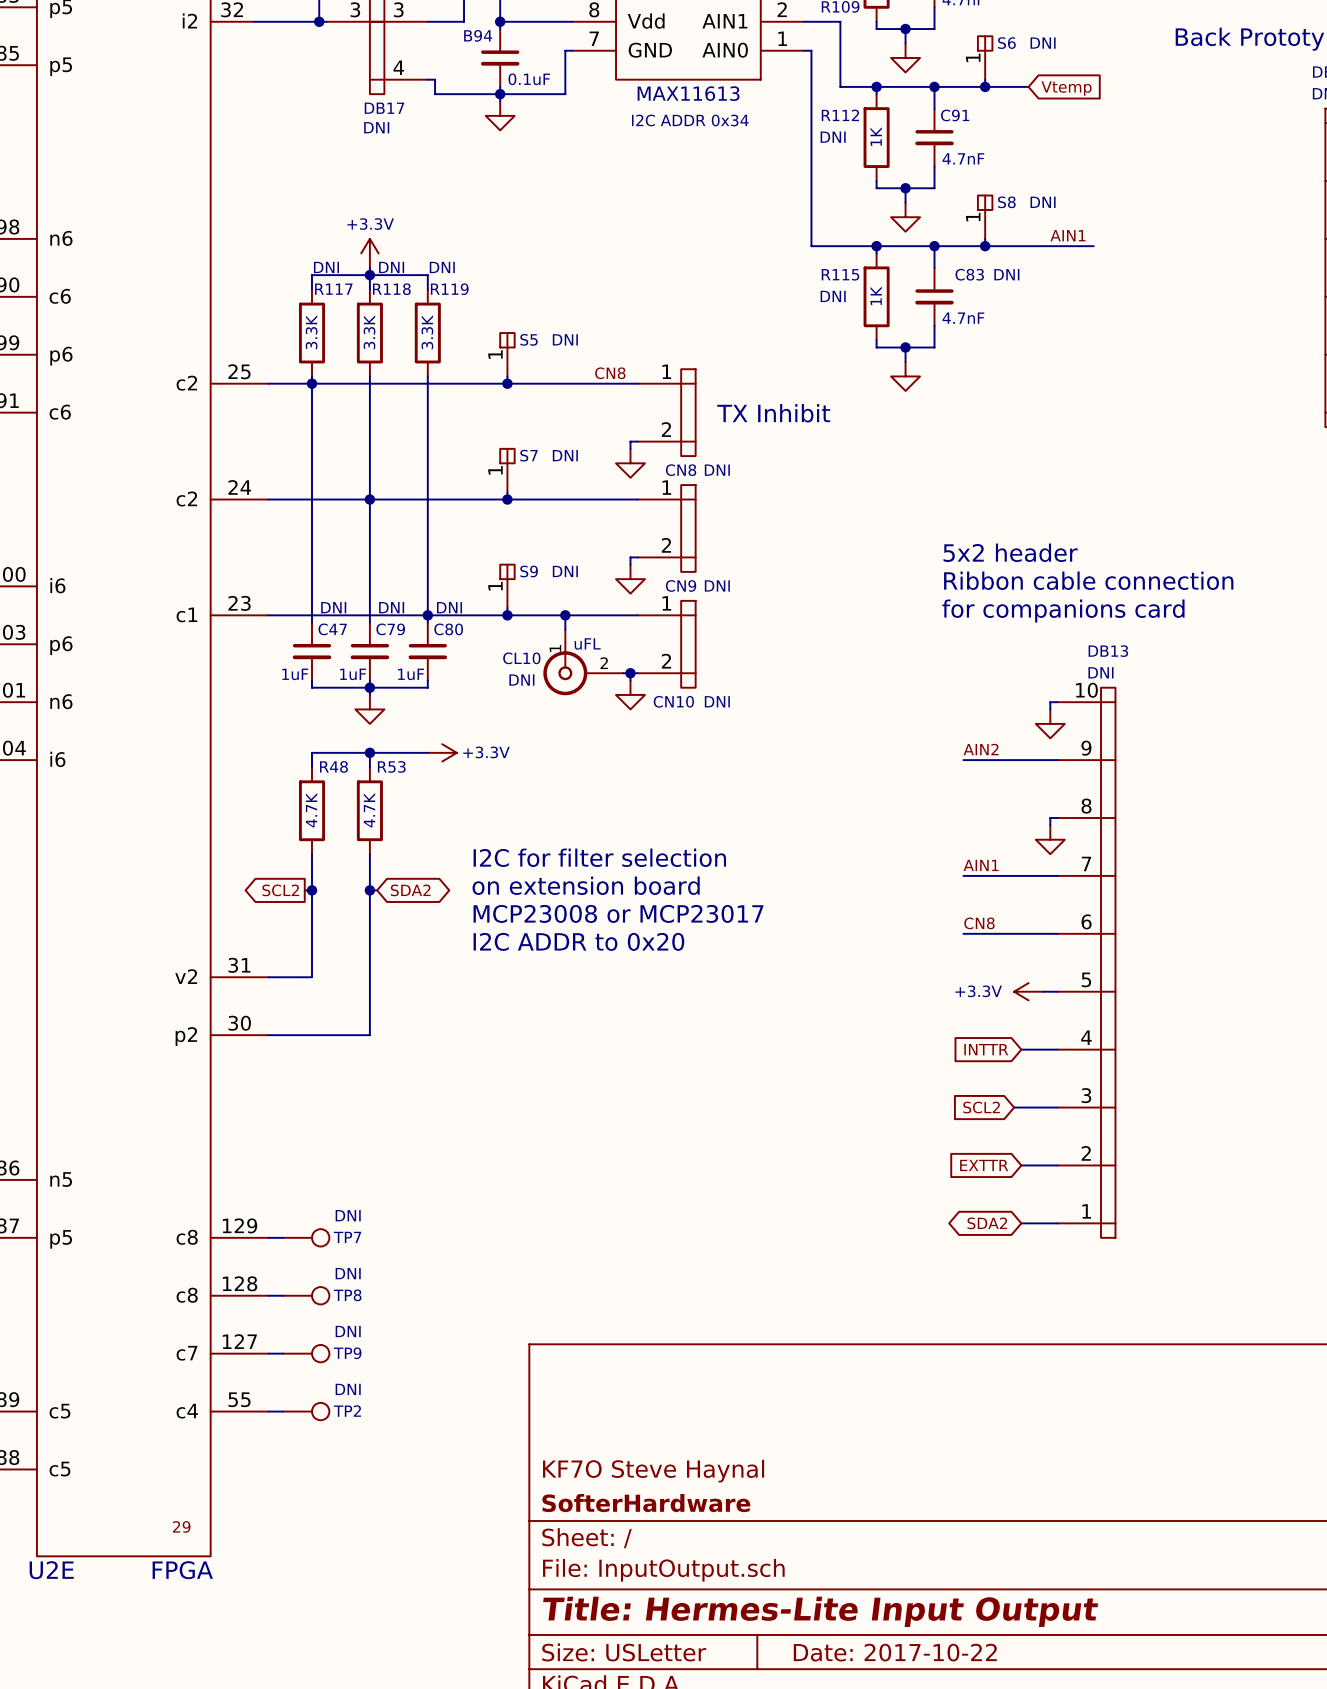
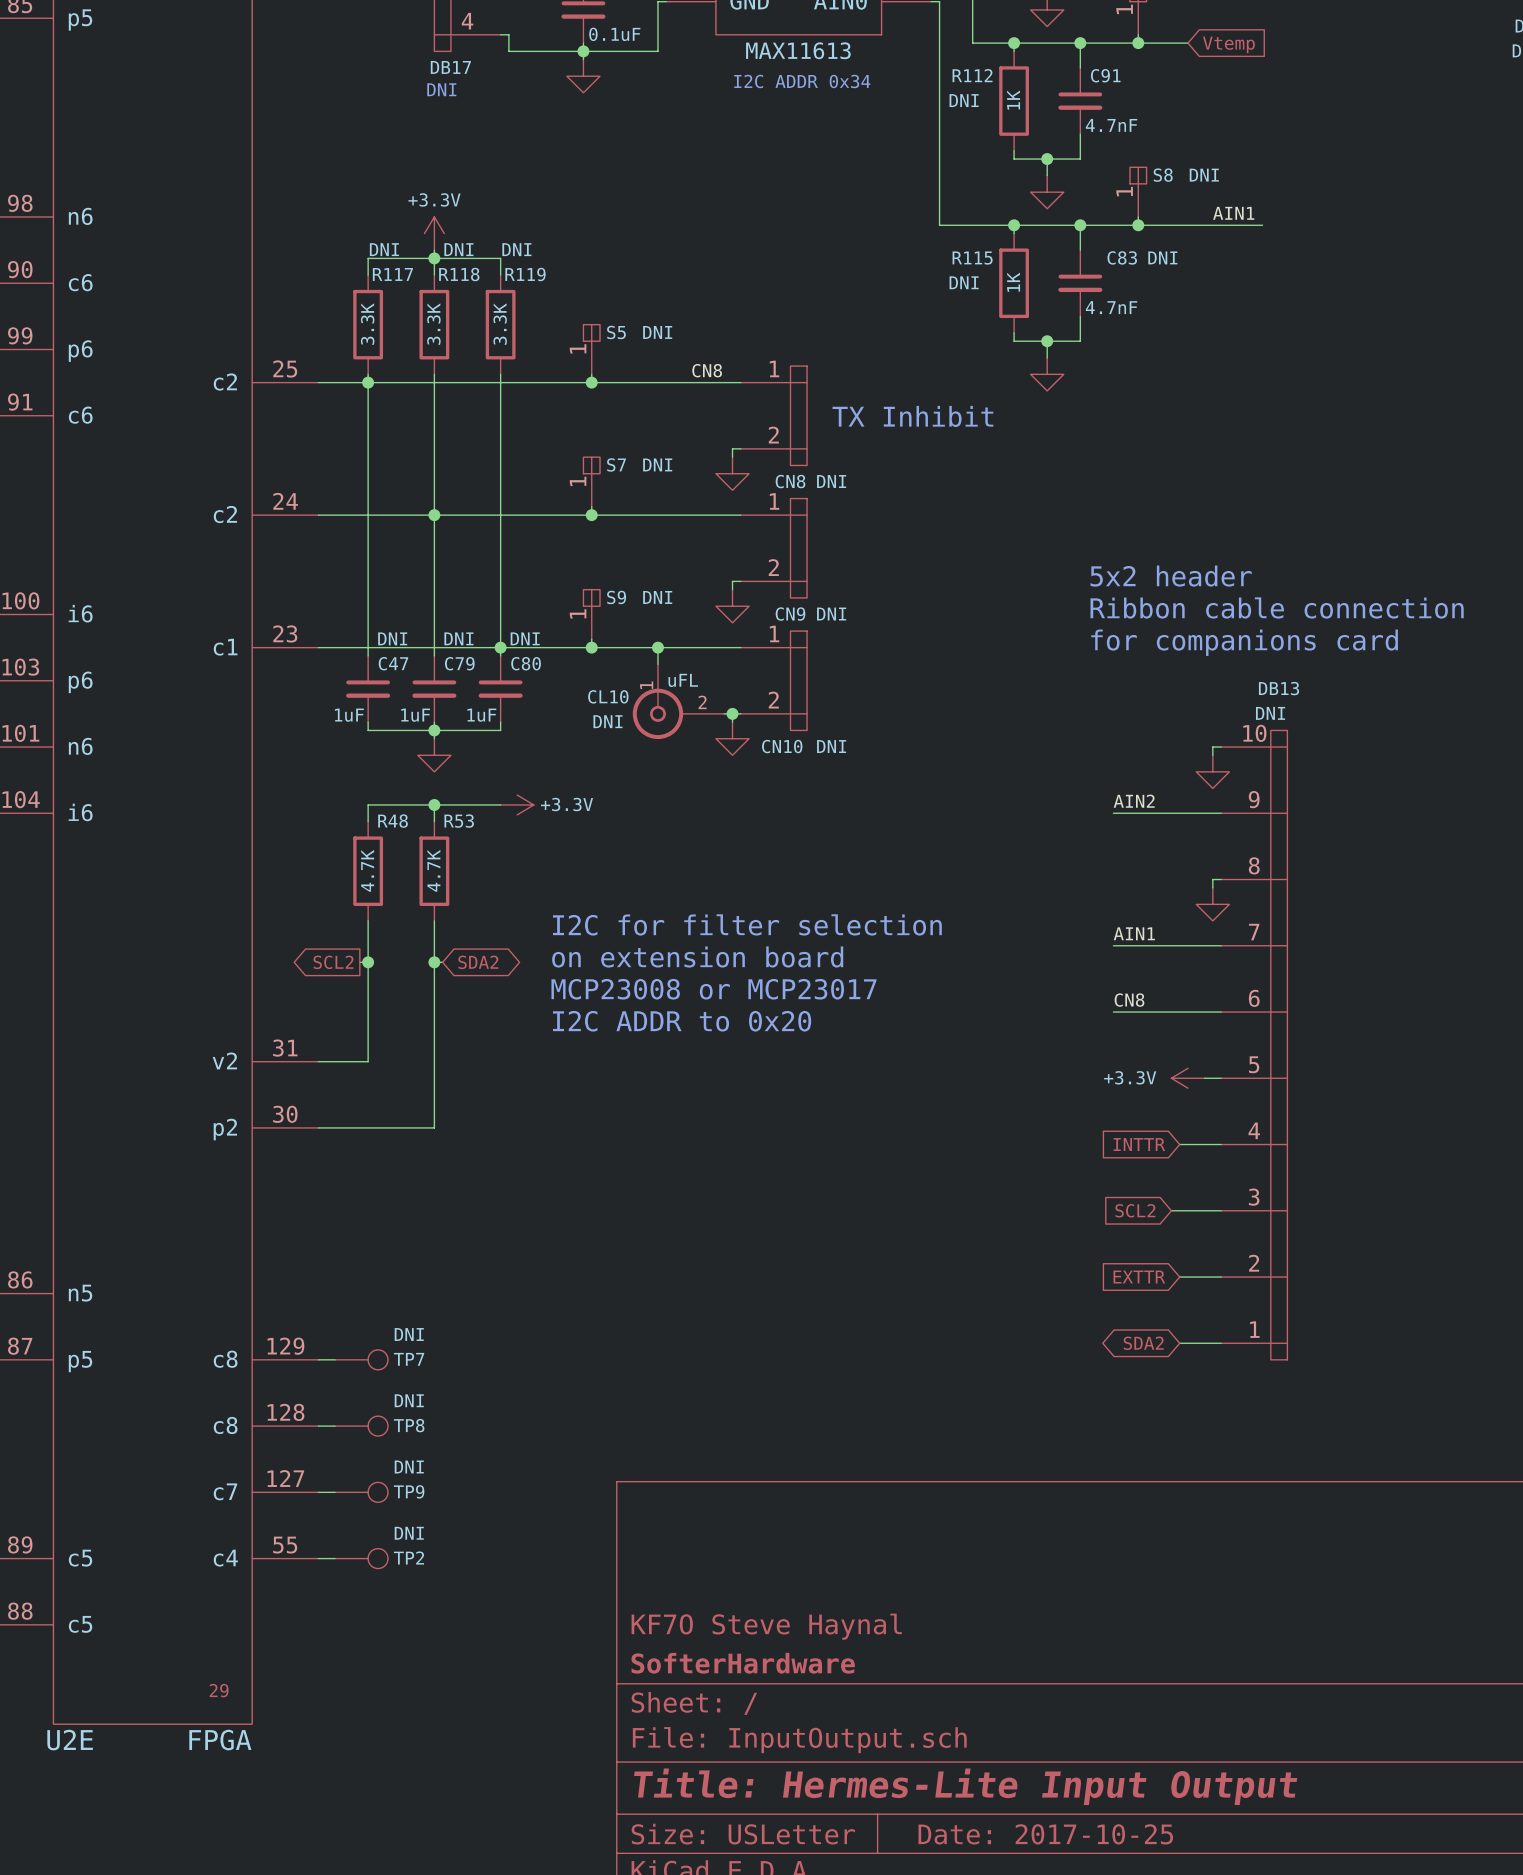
title block: Date: 2017-10-22 (895, 1652) -> Date: 2017-10-25 (1045, 1834)

